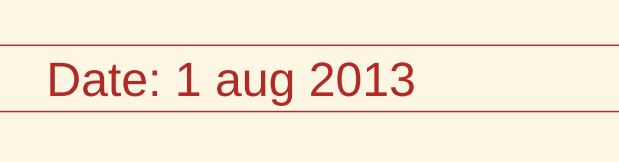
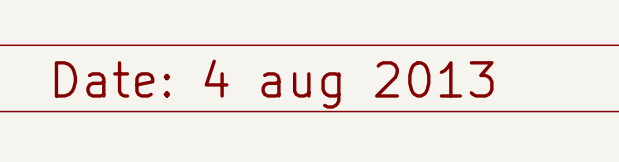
title block: Date: 1 aug 2013 (232, 84) -> Date: 4 aug 2013 (274, 84)

